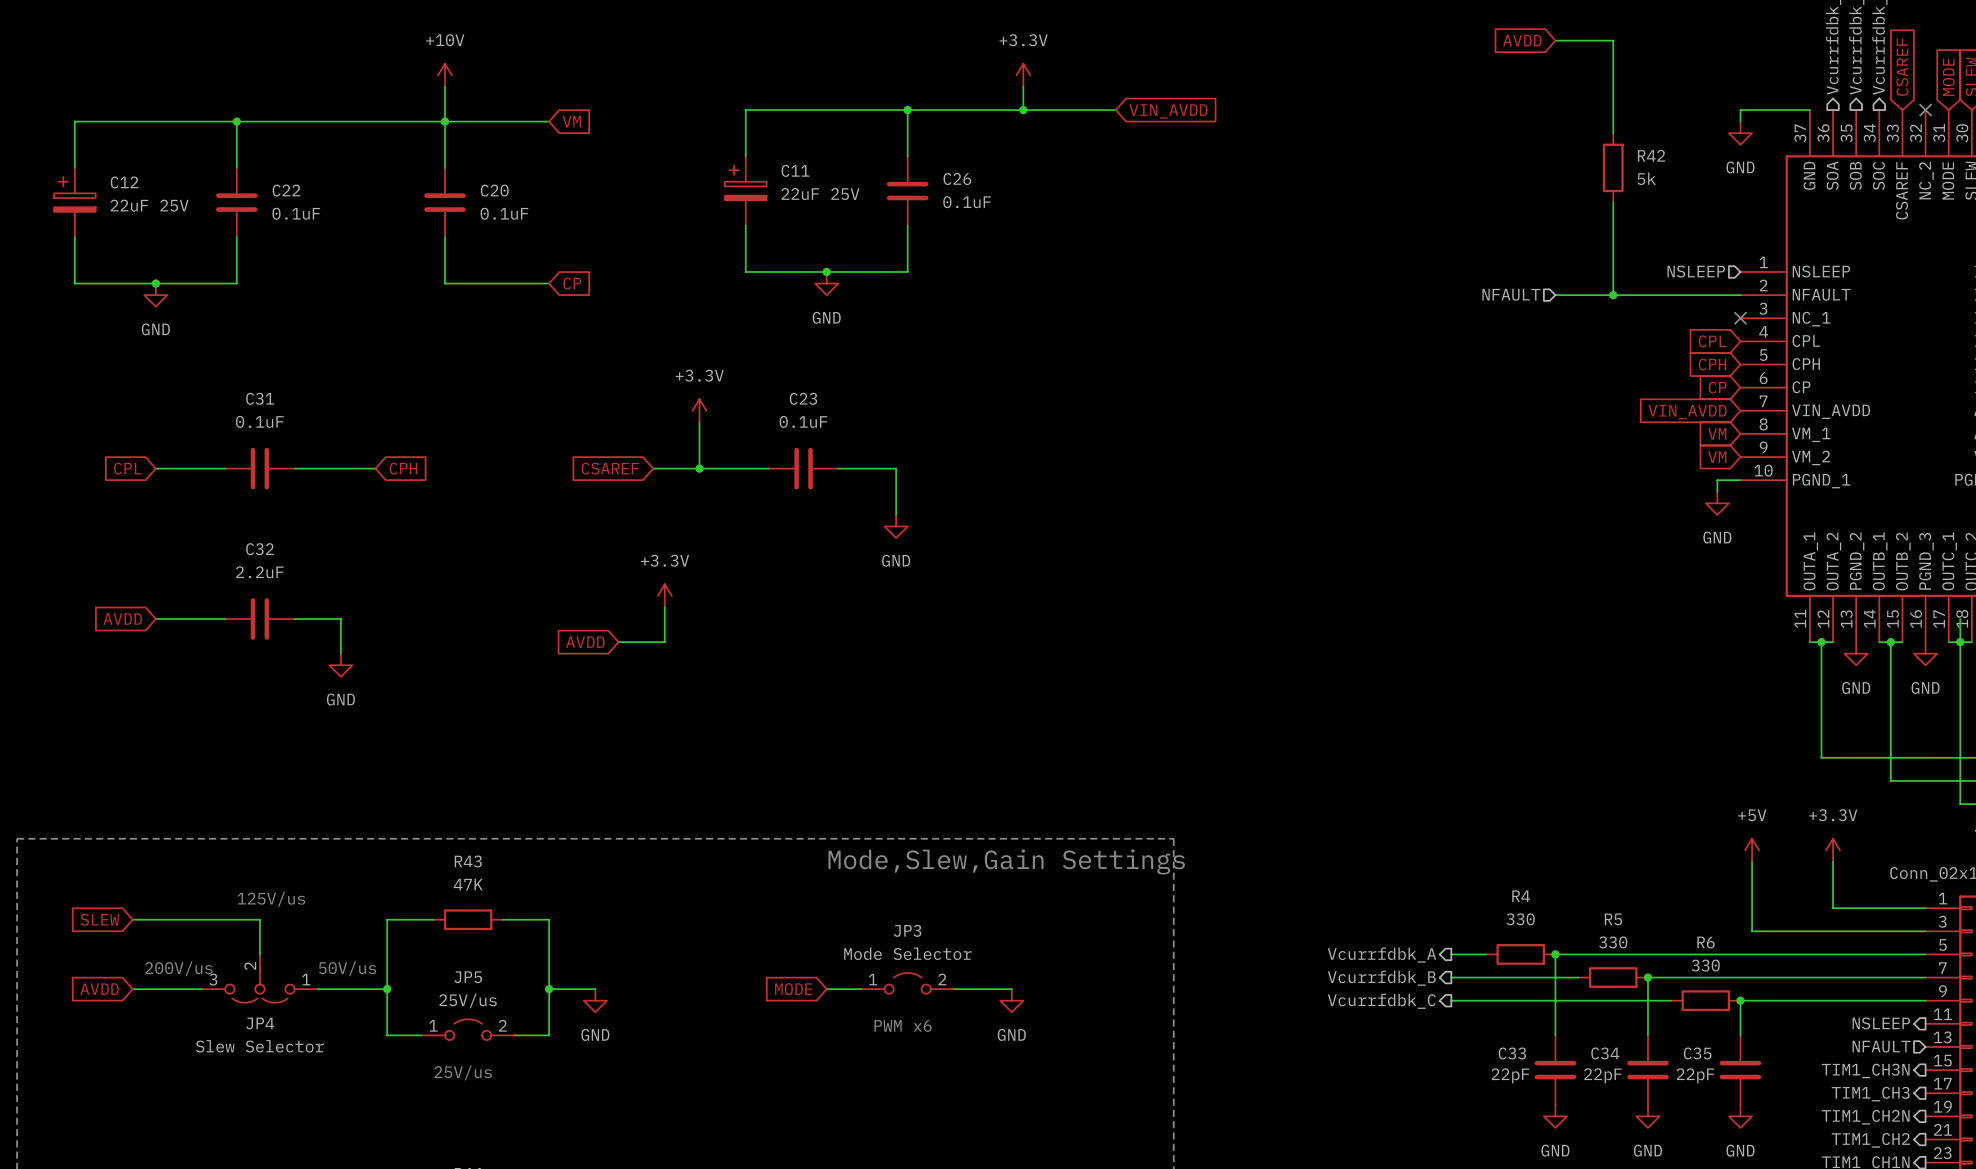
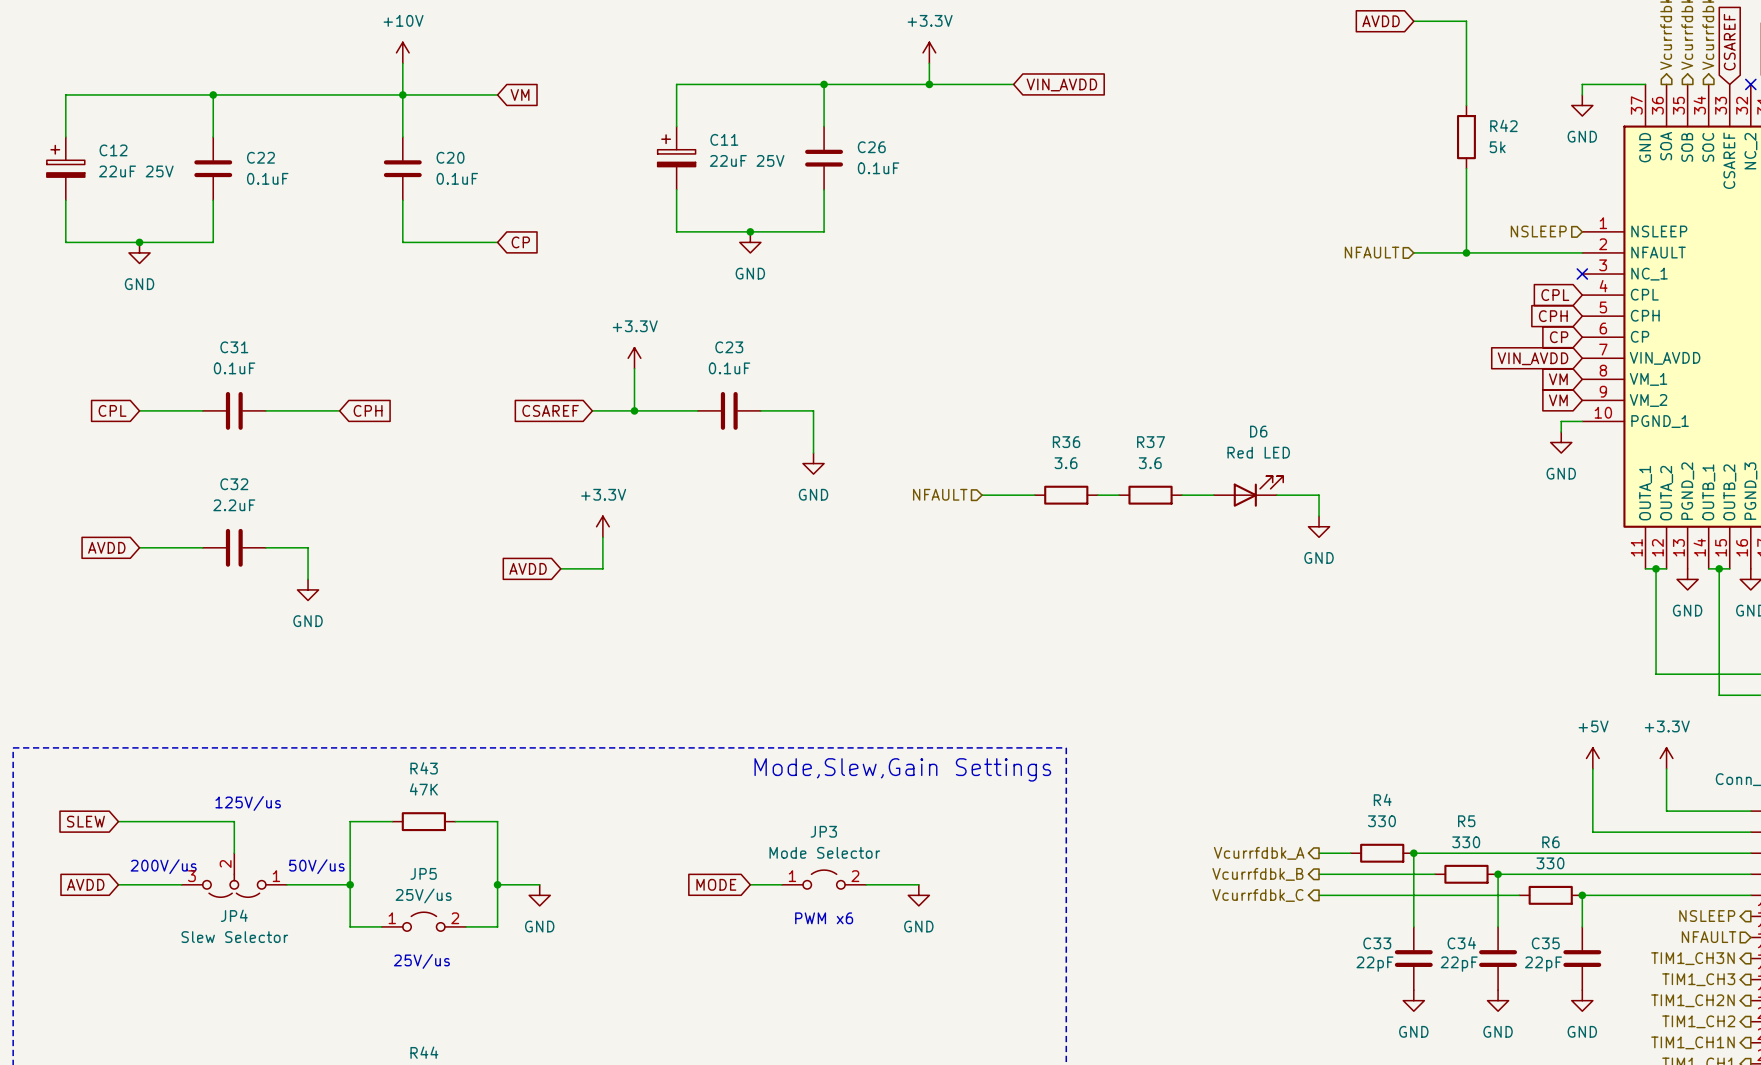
D6: none -> Red LED (1248, 491)
hierarchical label: none -> NFAULT (940, 494)
wire: none -> (982, 495) (1034, 495)
R36: none -> 3.6 (1066, 495)
wire: none -> (1097, 495) (1118, 495)
R37: none -> 3.6 (1150, 495)
wire: none -> (1182, 495) (1213, 495)
wire: none -> (1276, 495) (1319, 495) (1319, 516)
power symbol: none -> GND (1319, 526)

